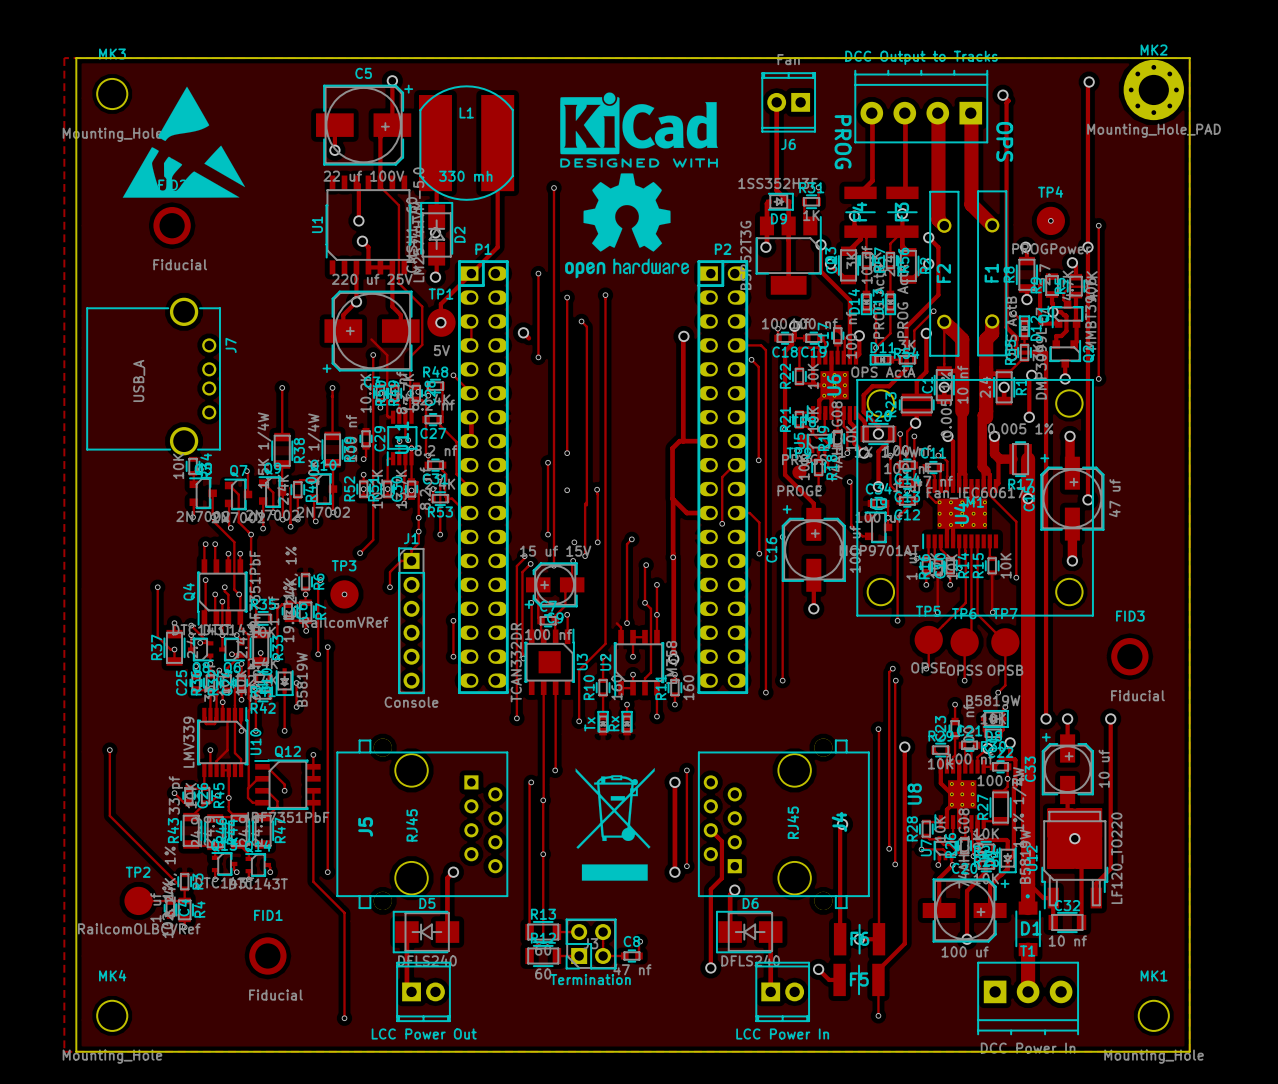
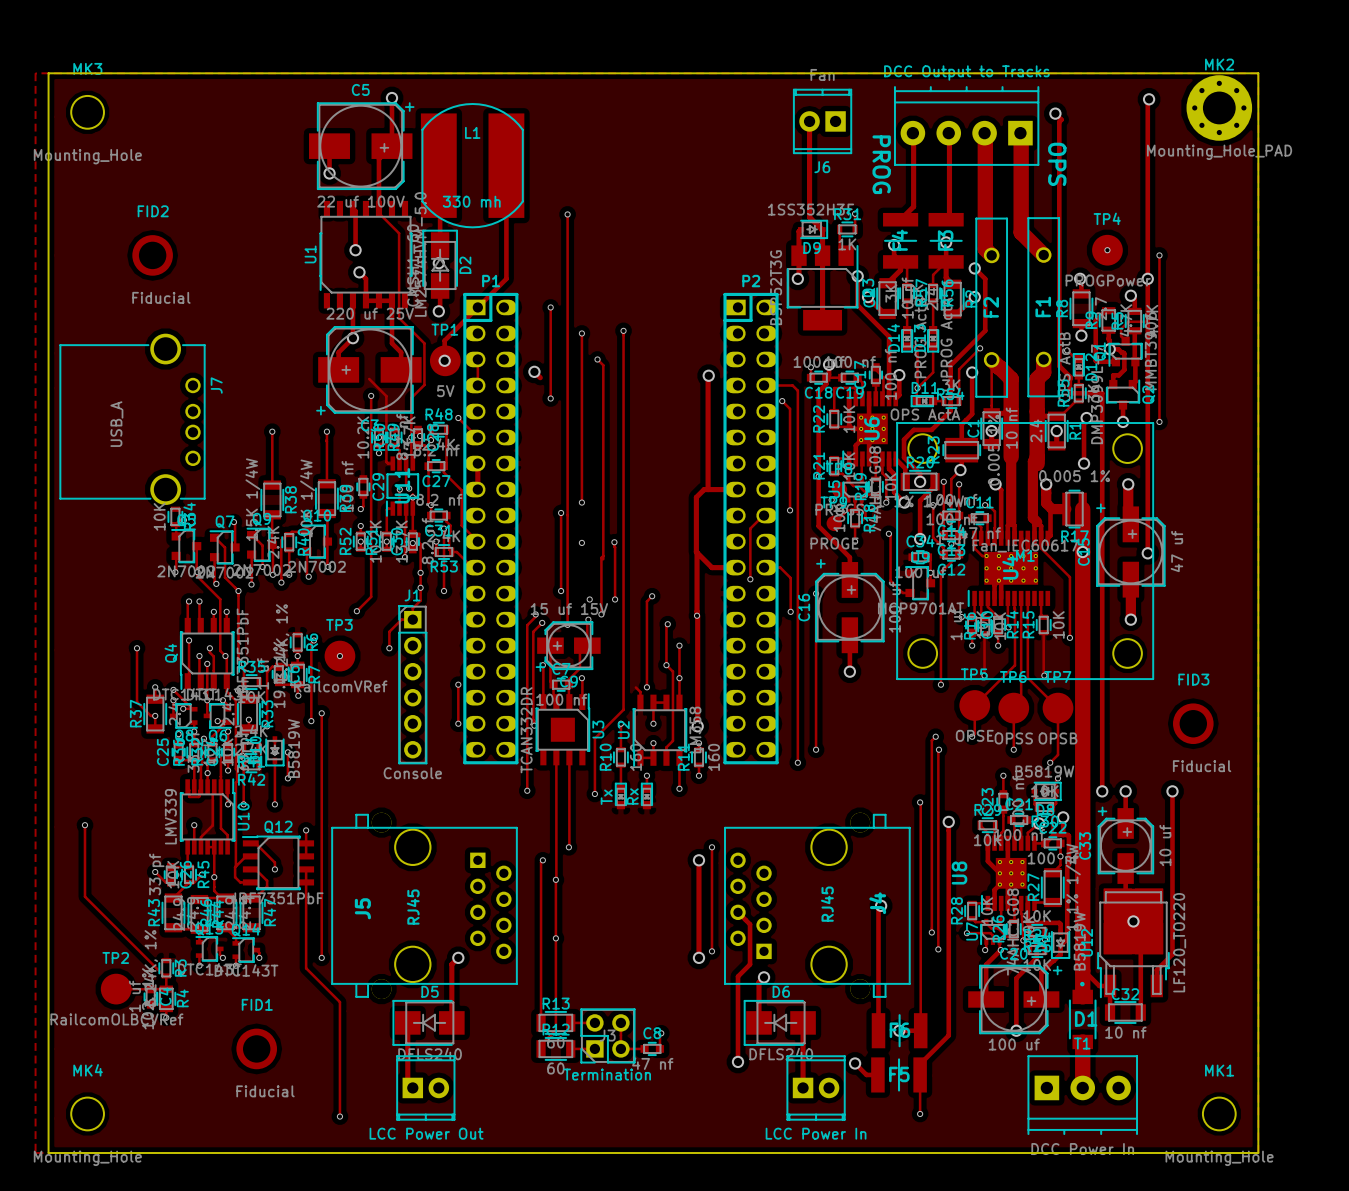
drawing: [122, 86, 246, 198] -> none
drawing: [560, 92, 718, 279] -> none
drawing: [575, 767, 655, 881] -> none

